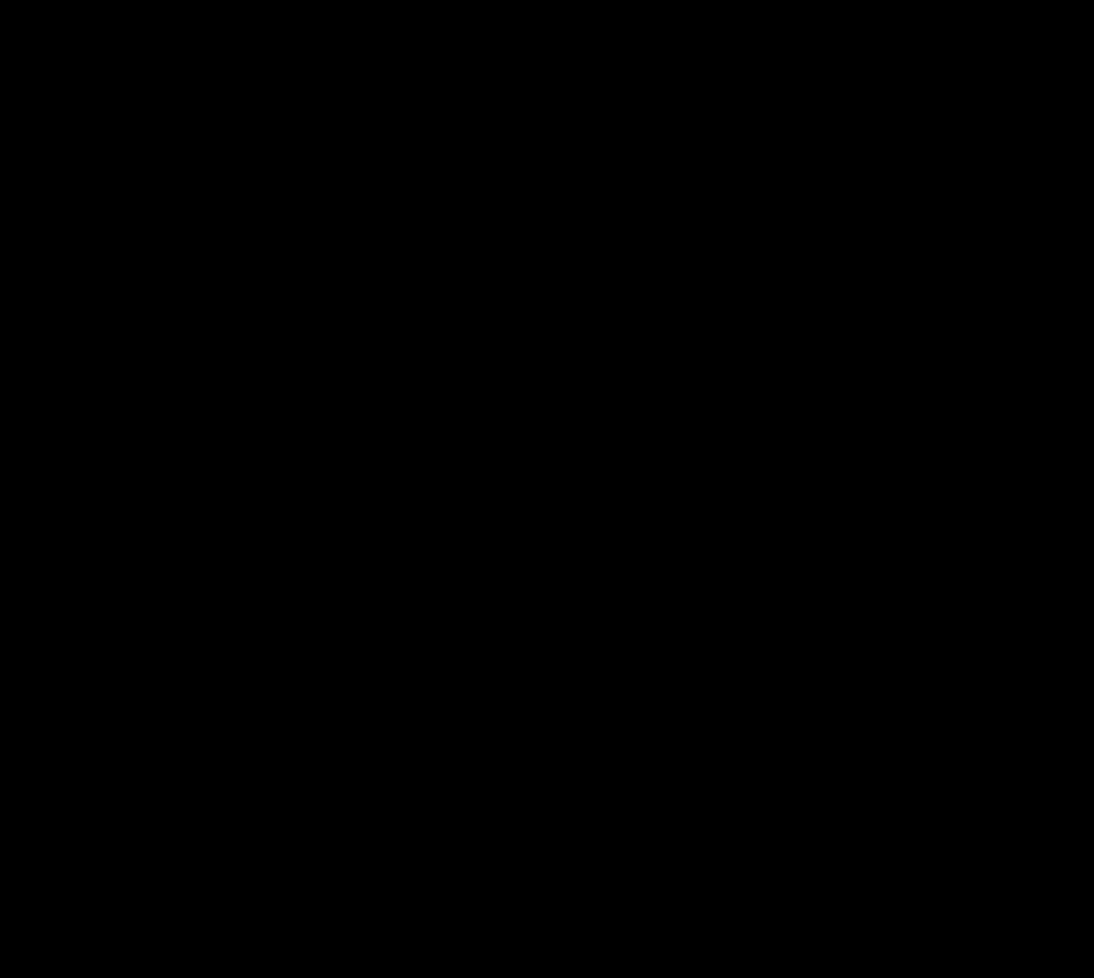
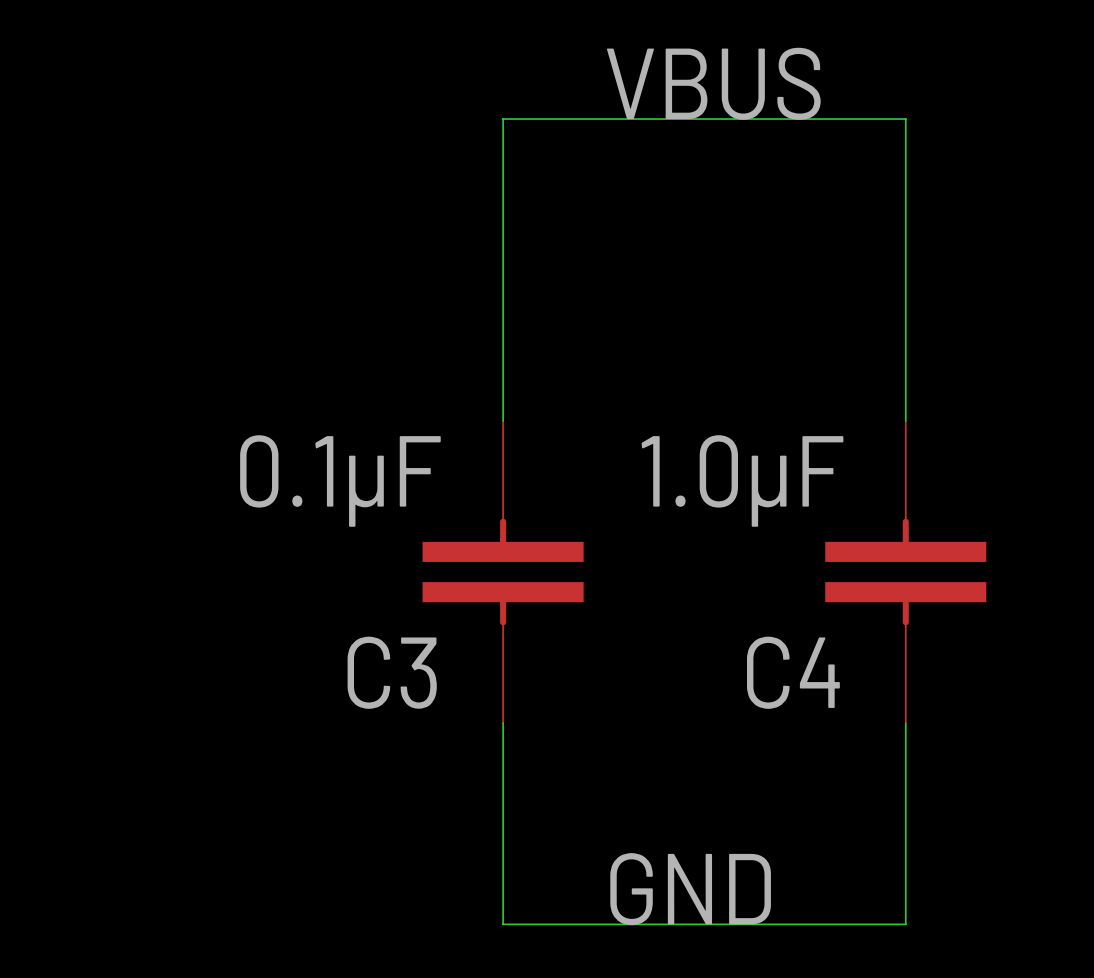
label: none -> VBUS (713, 83)
wire: none -> (503, 421) (503, 119) (905, 119) (905, 421)
C3: none -> 0.1μF (503, 572)
C4: none -> 1.0μF (905, 572)
wire: none -> (503, 723) (503, 924) (905, 924) (905, 723)
label: none -> GND (690, 889)

